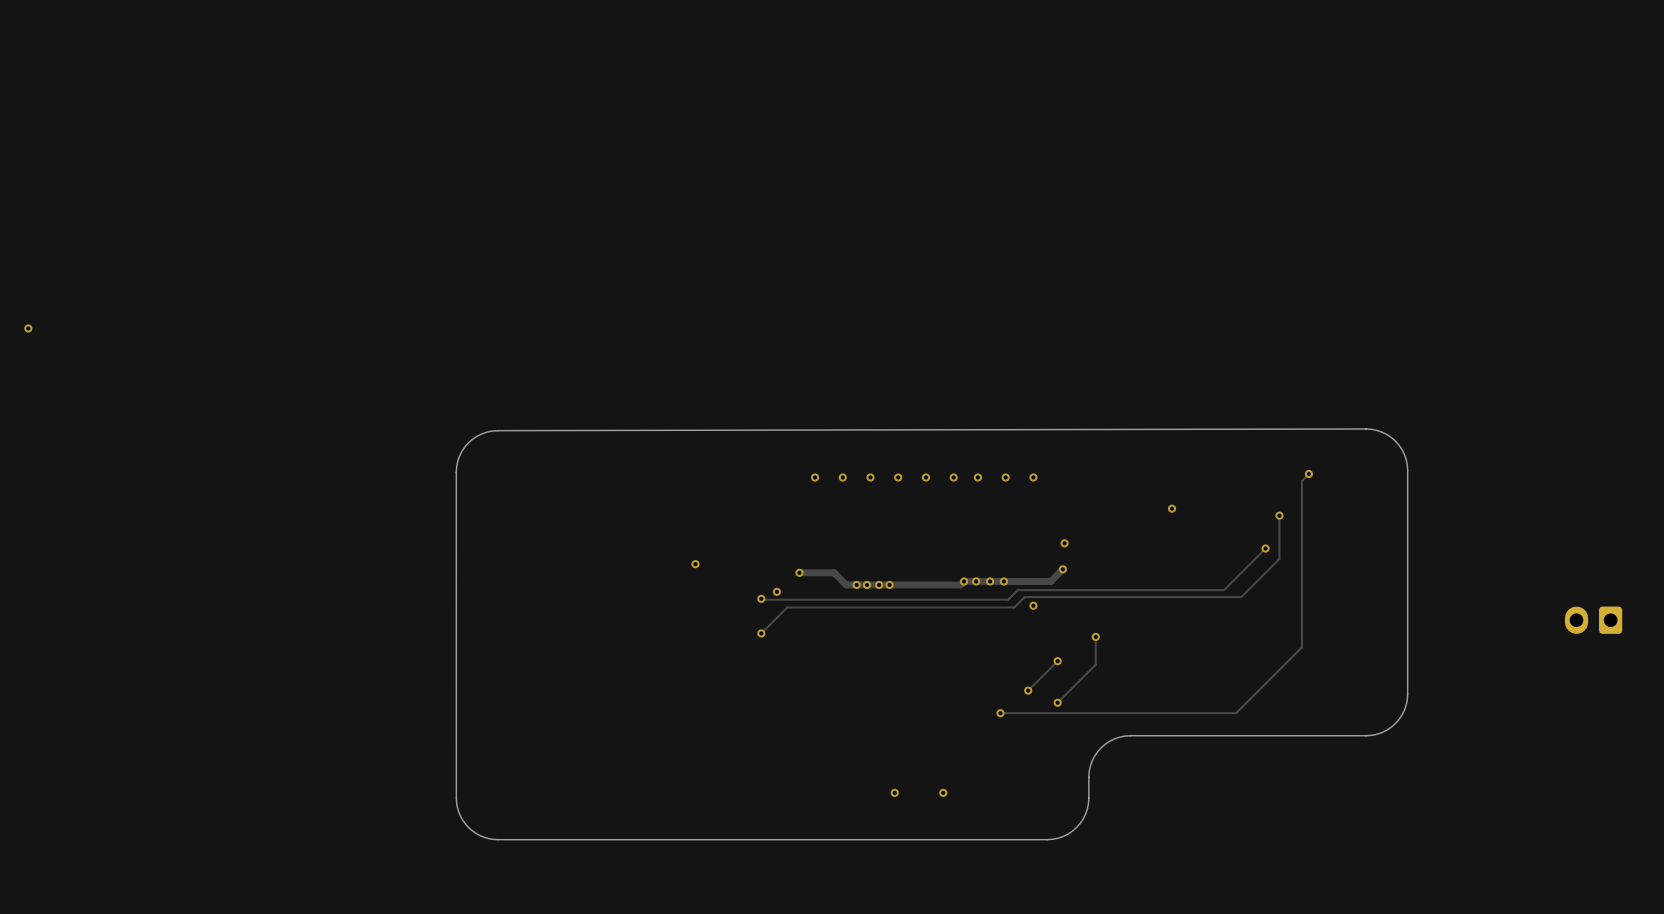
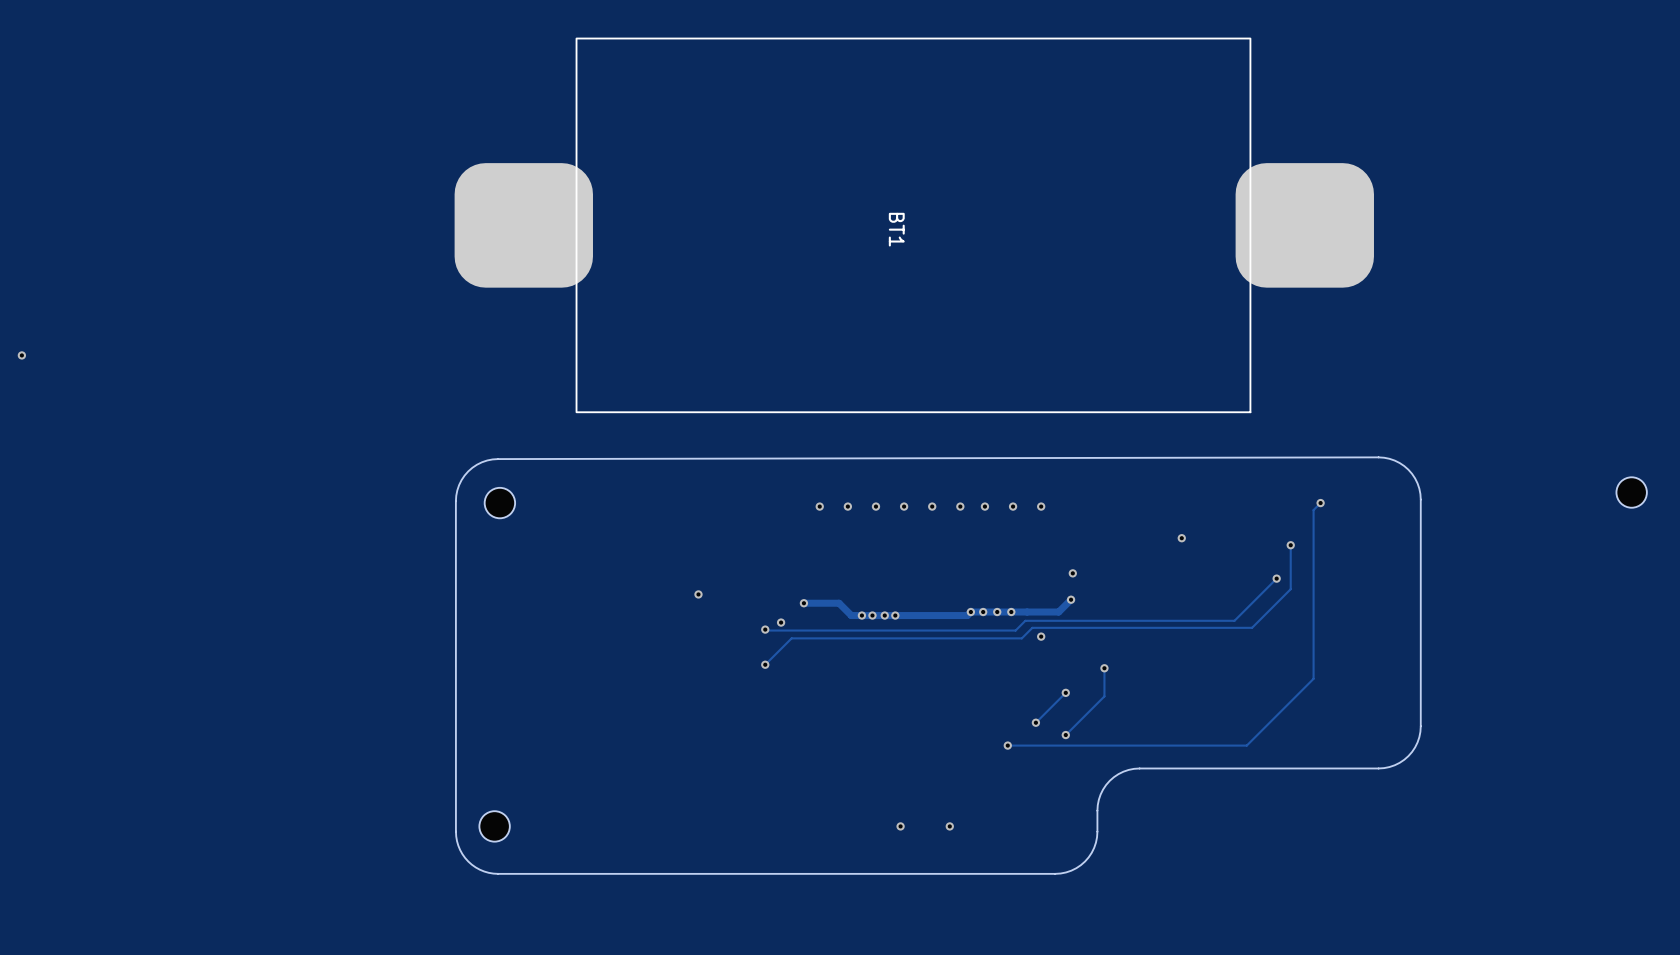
BT1: none -> (914, 225)
part: none -> (1631, 492)
part: none -> (499, 503)
part: (1593, 620) -> none
part: none -> (494, 826)

